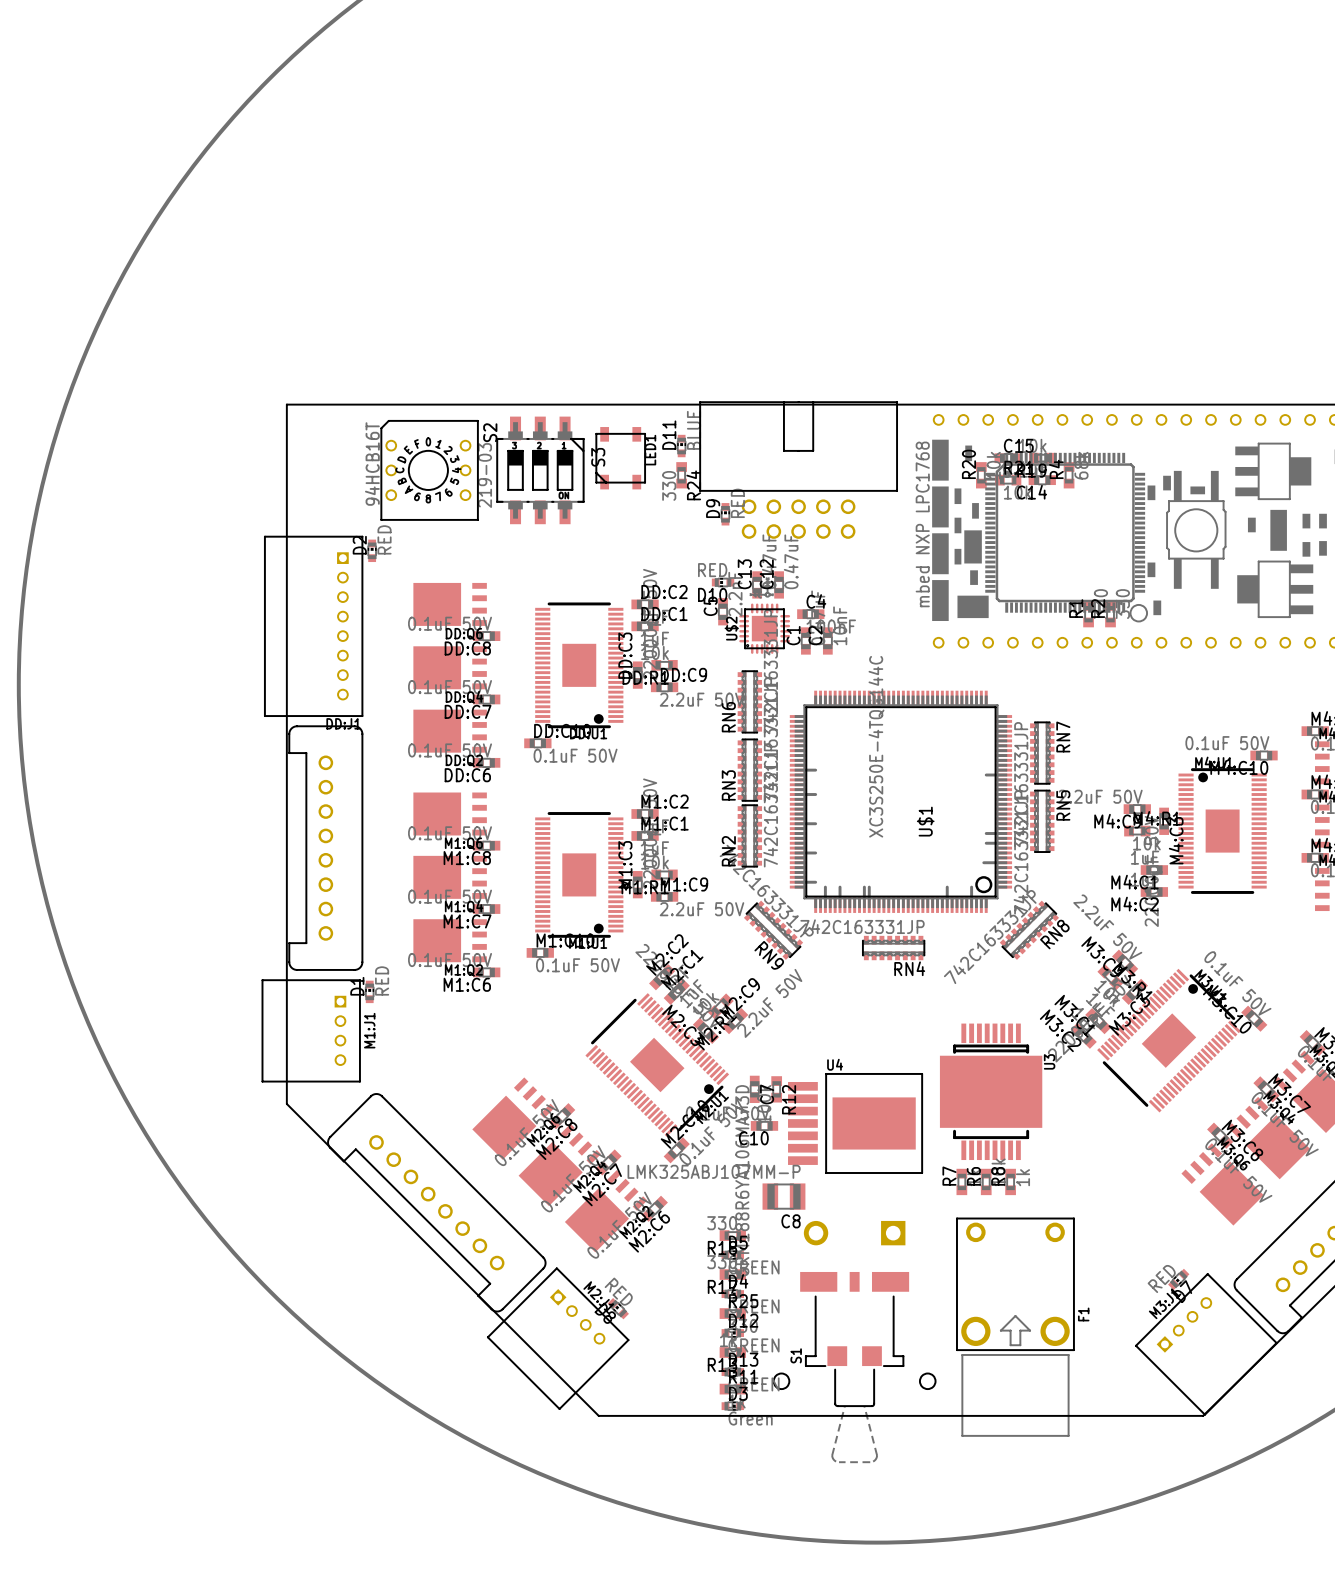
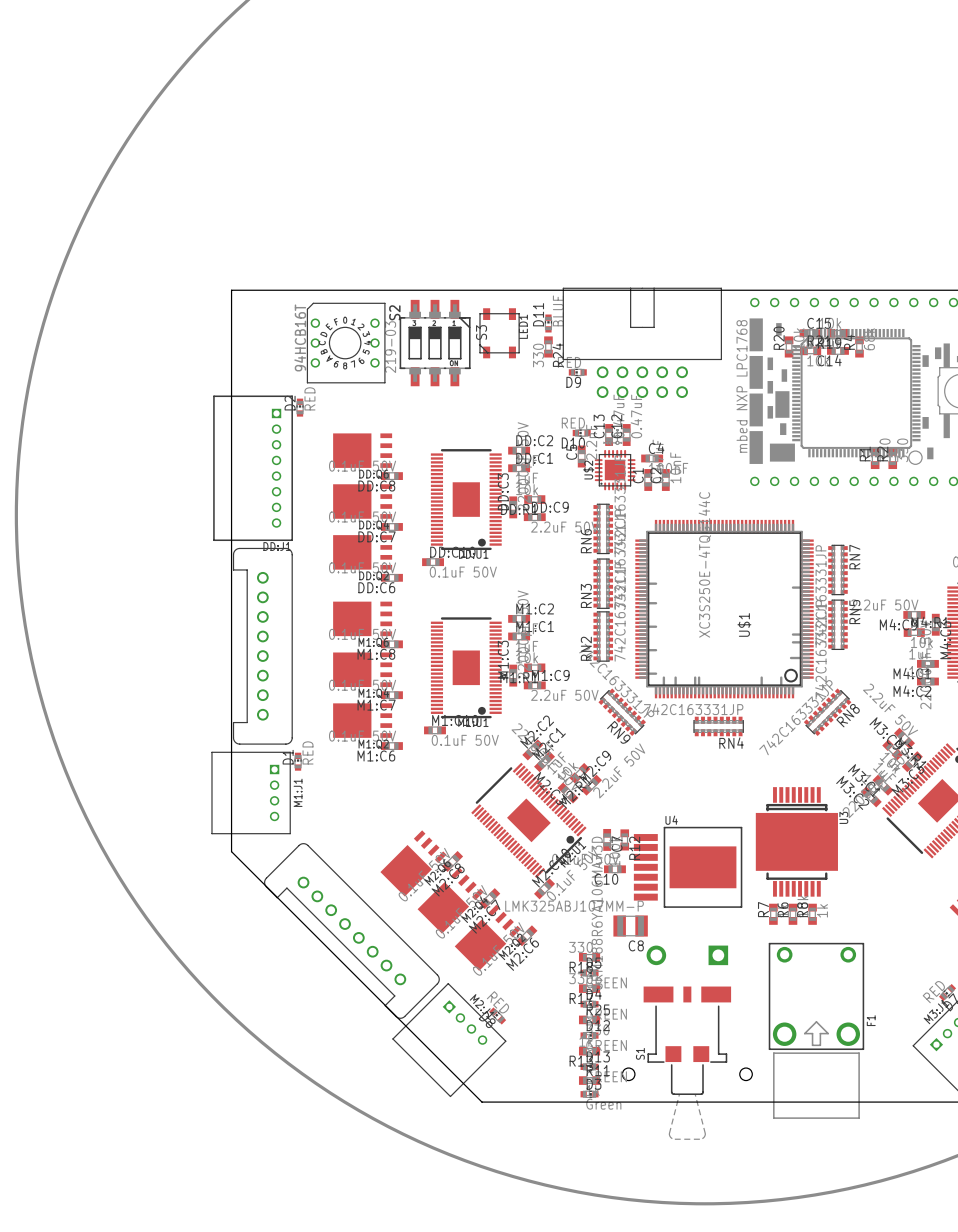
D9 rotation: 0° (725, 514) -> 90° counterclockwise (577, 372)

